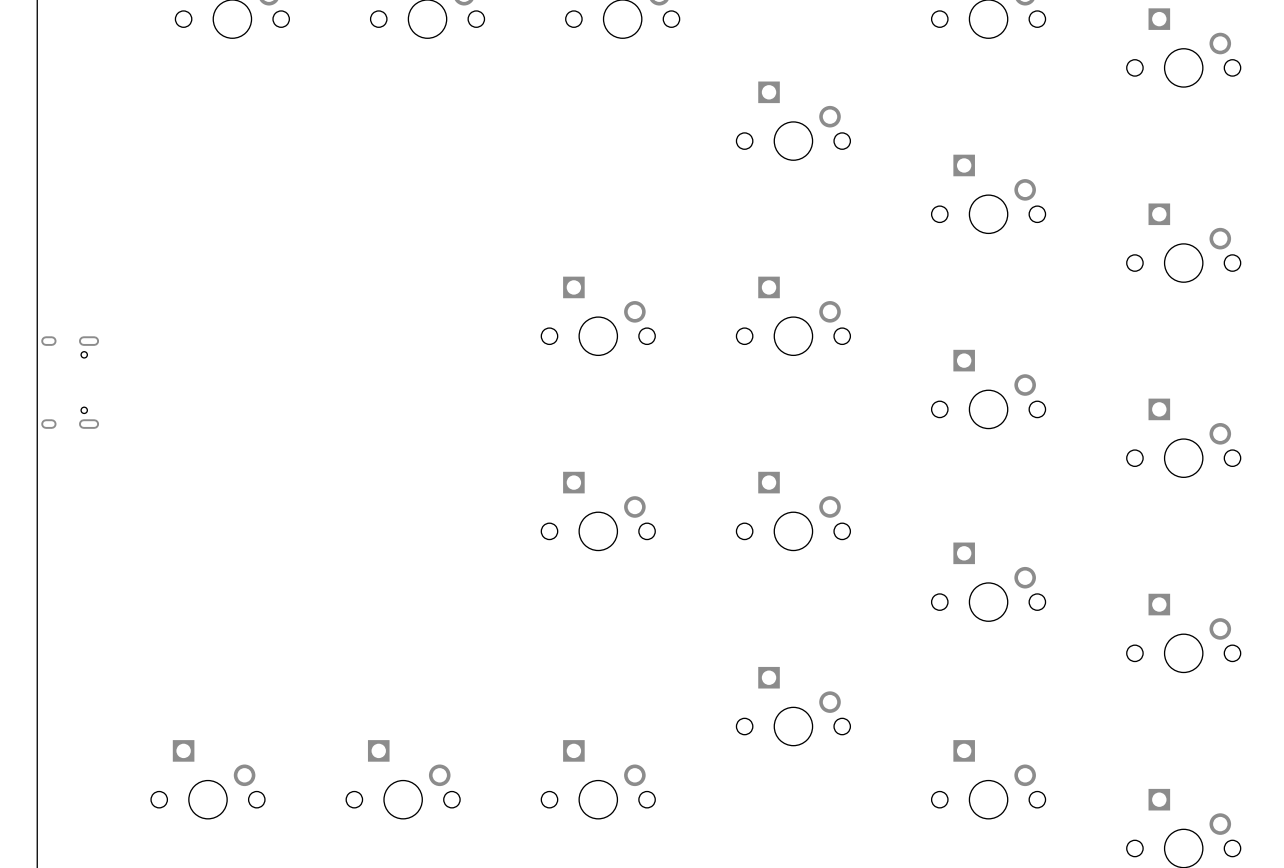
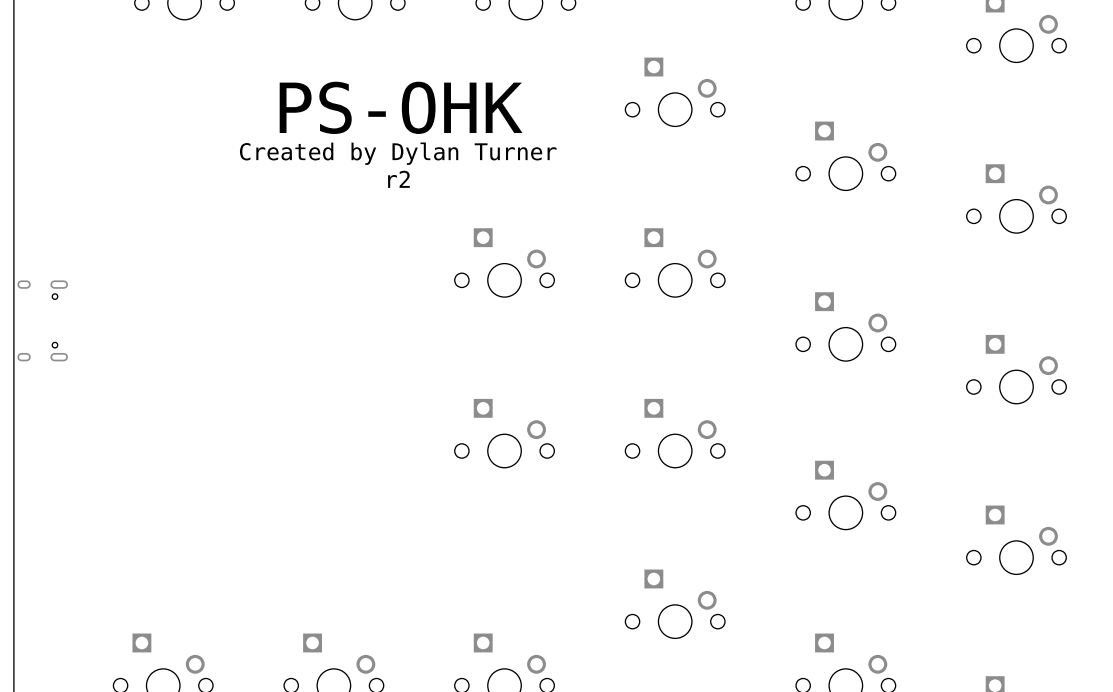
text: none -> PS-OHK (401, 107)
text: none -> Created by Dylan Turner (398, 153)
text: none -> r2 (398, 179)

